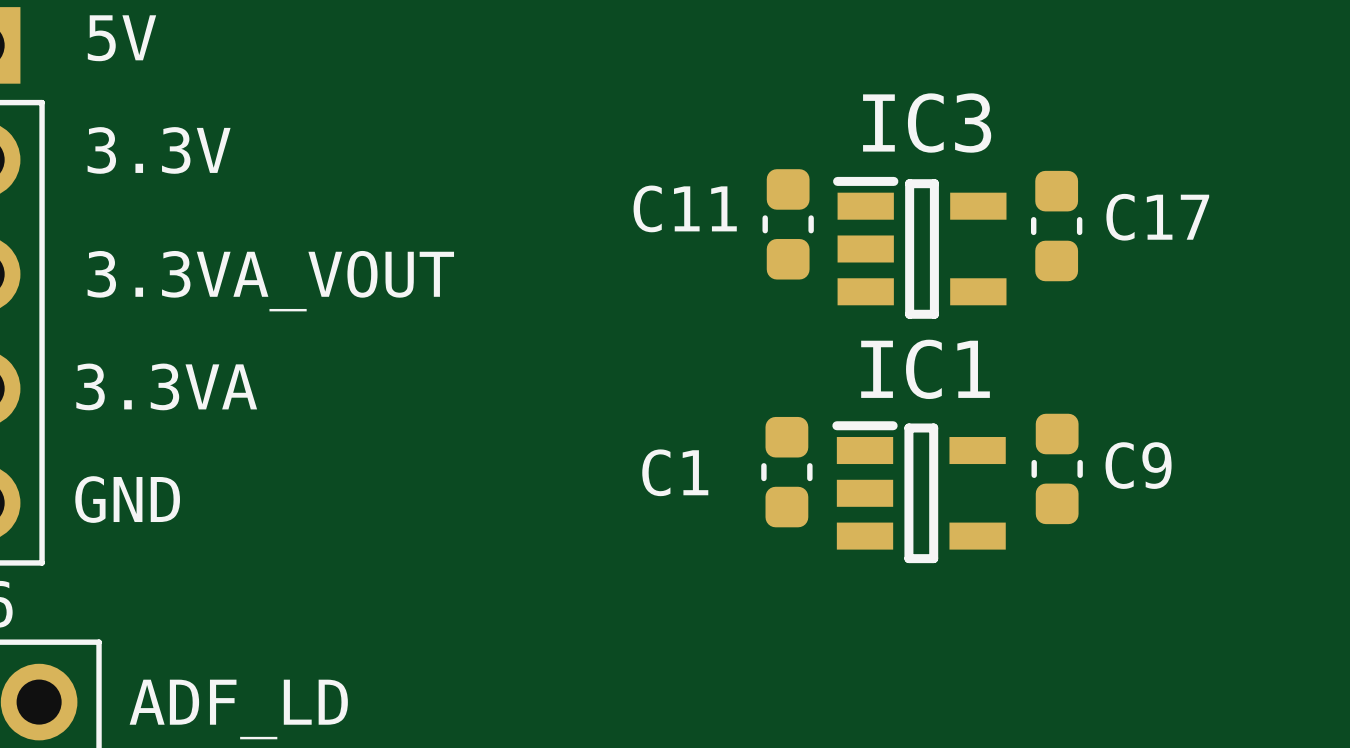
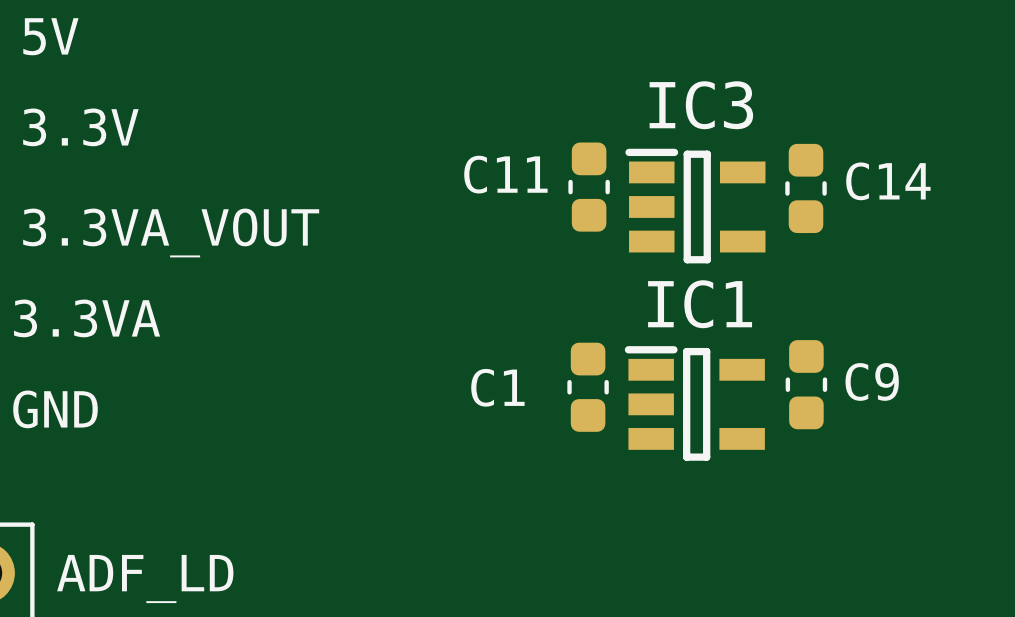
C17 name: C17 (1157, 217) -> C14 (888, 181)

